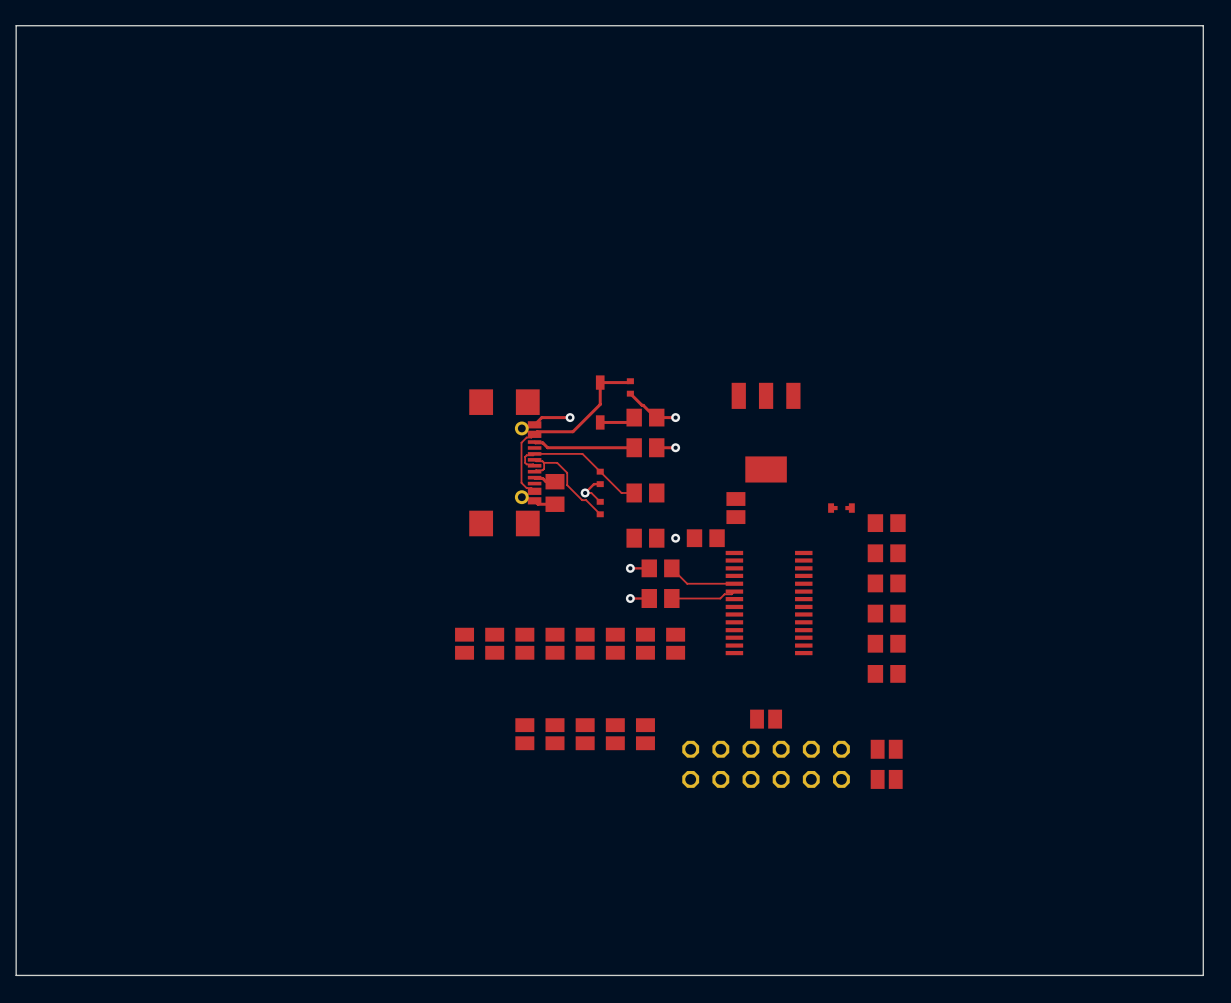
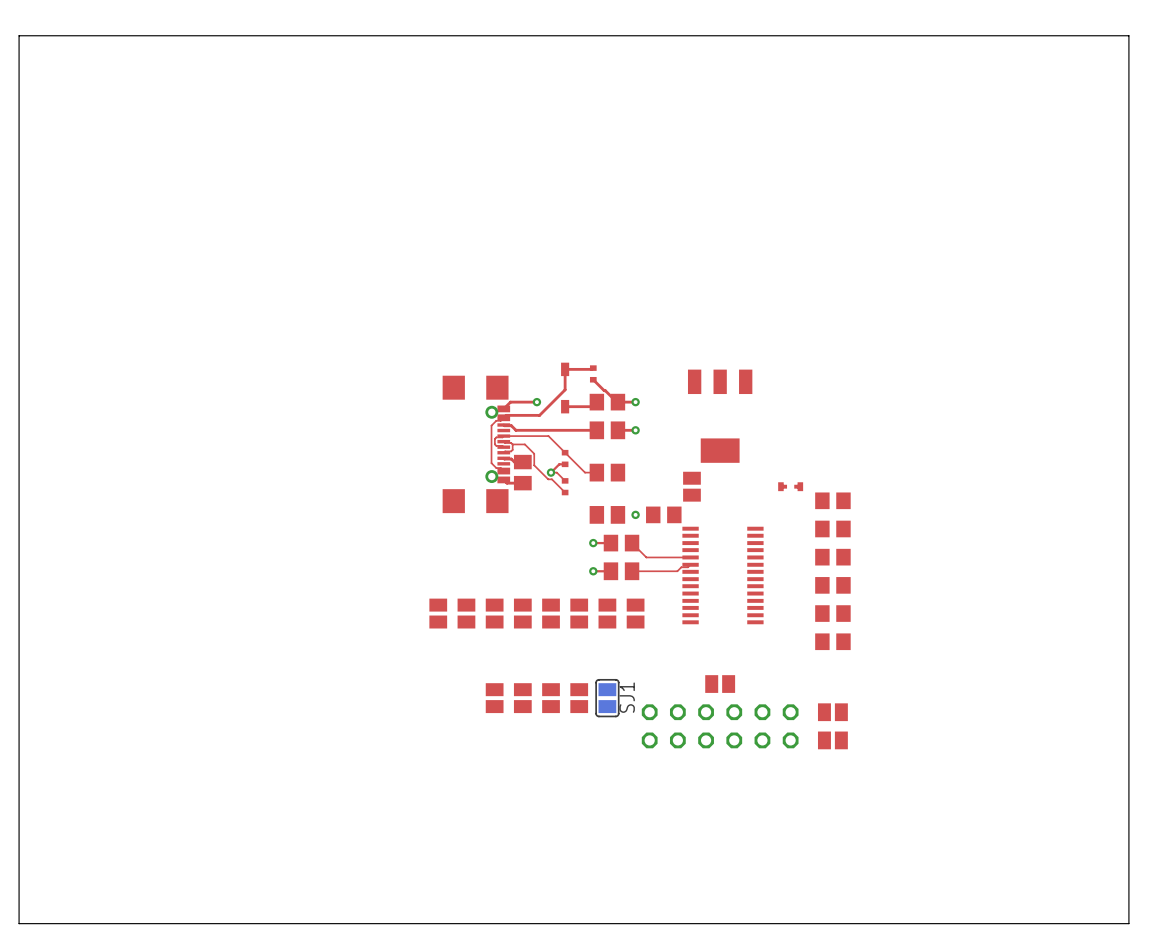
SJ1 side: top (645, 734) -> bottom (607, 698)

